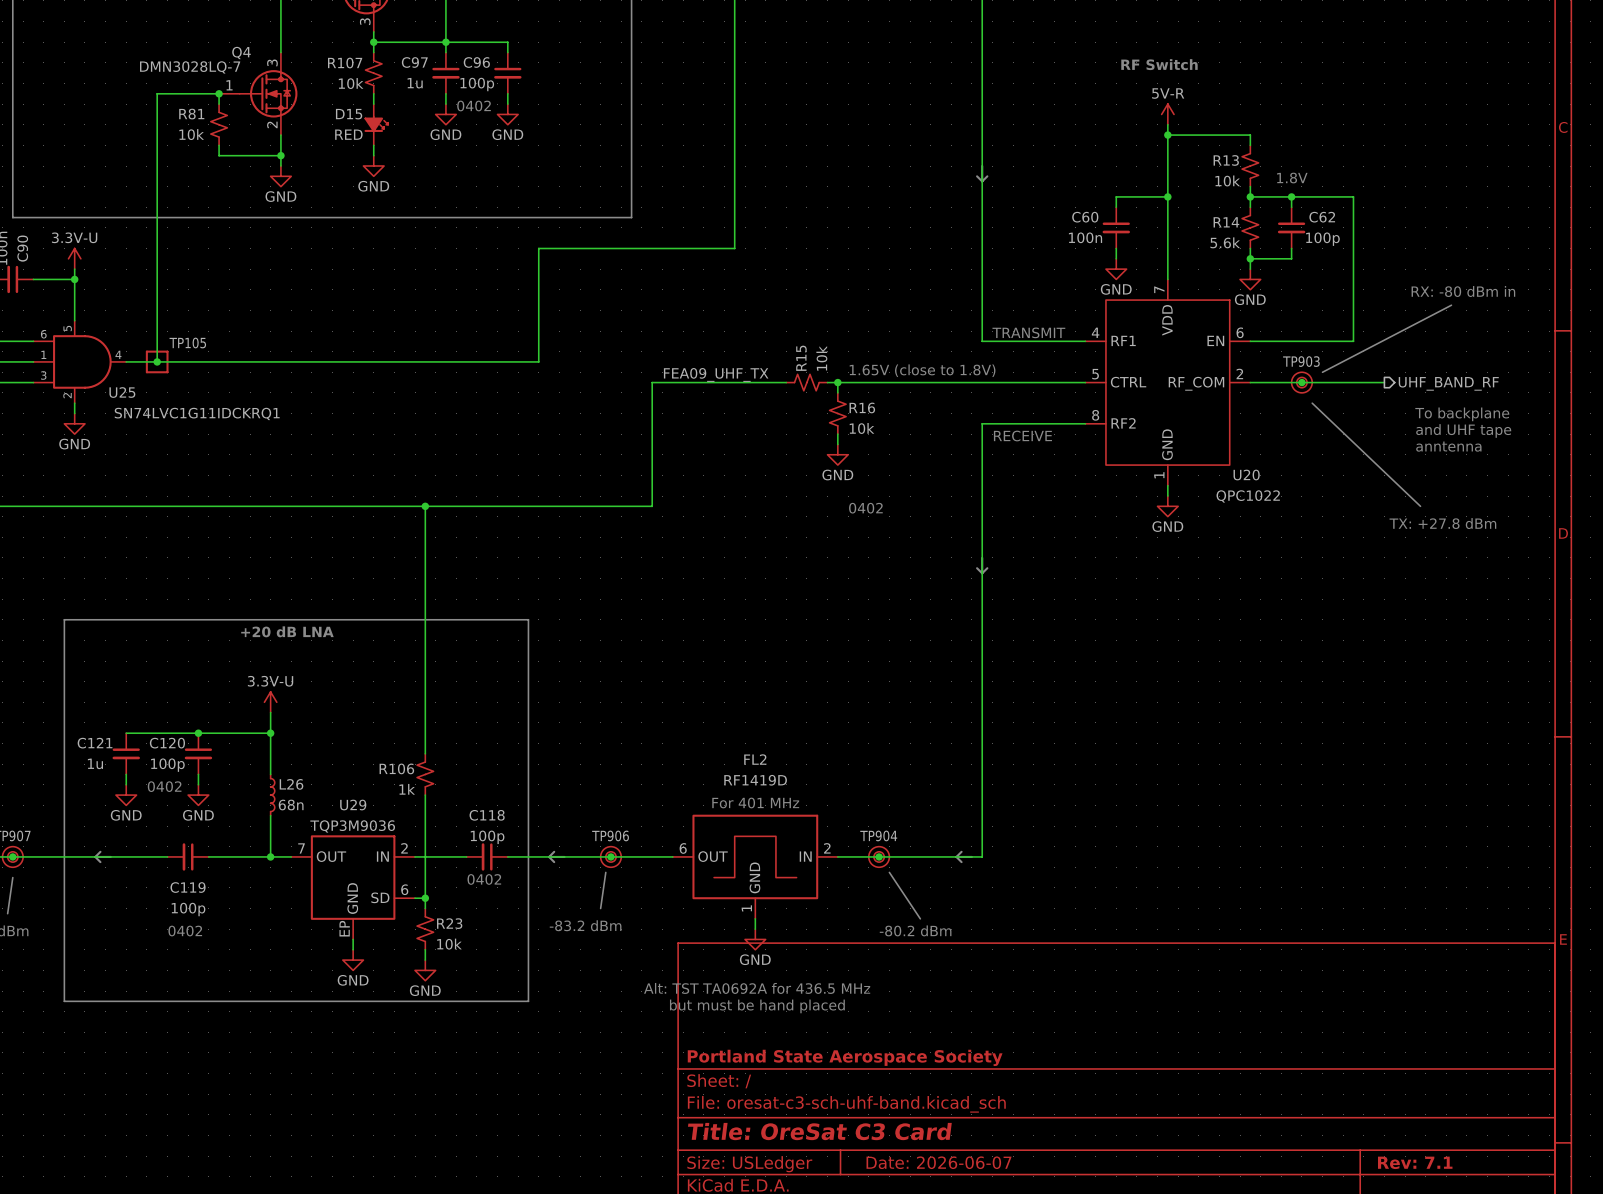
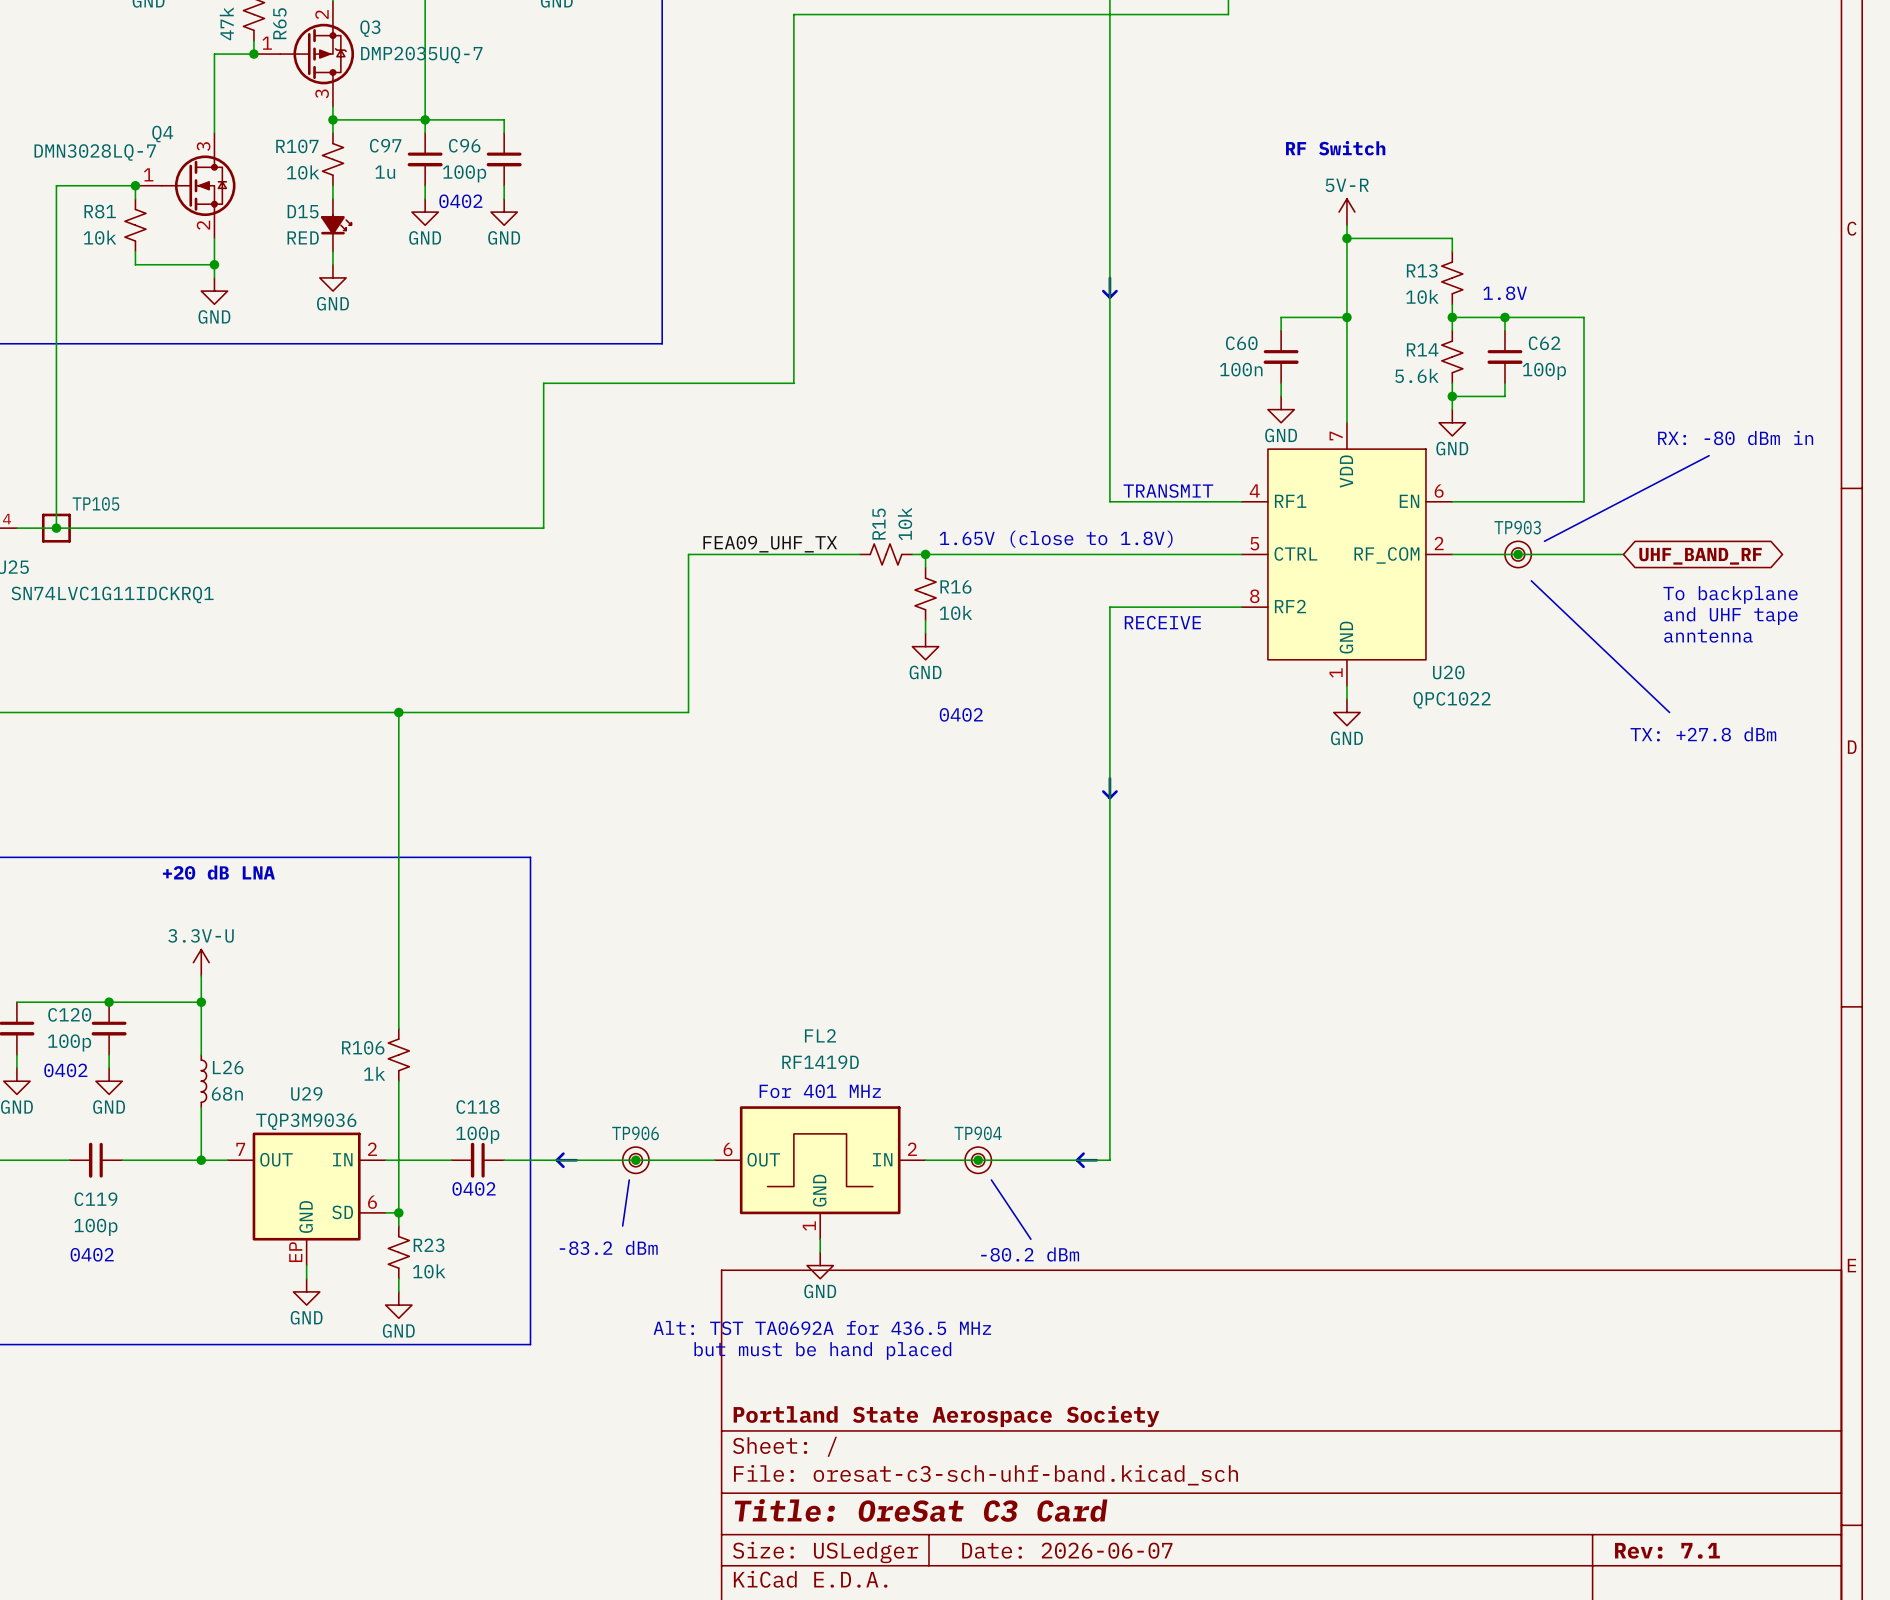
hierarchical label: UHF_BAND_RF (1448, 383) -> none
global label: none -> UHF_BAND_RF (1700, 556)

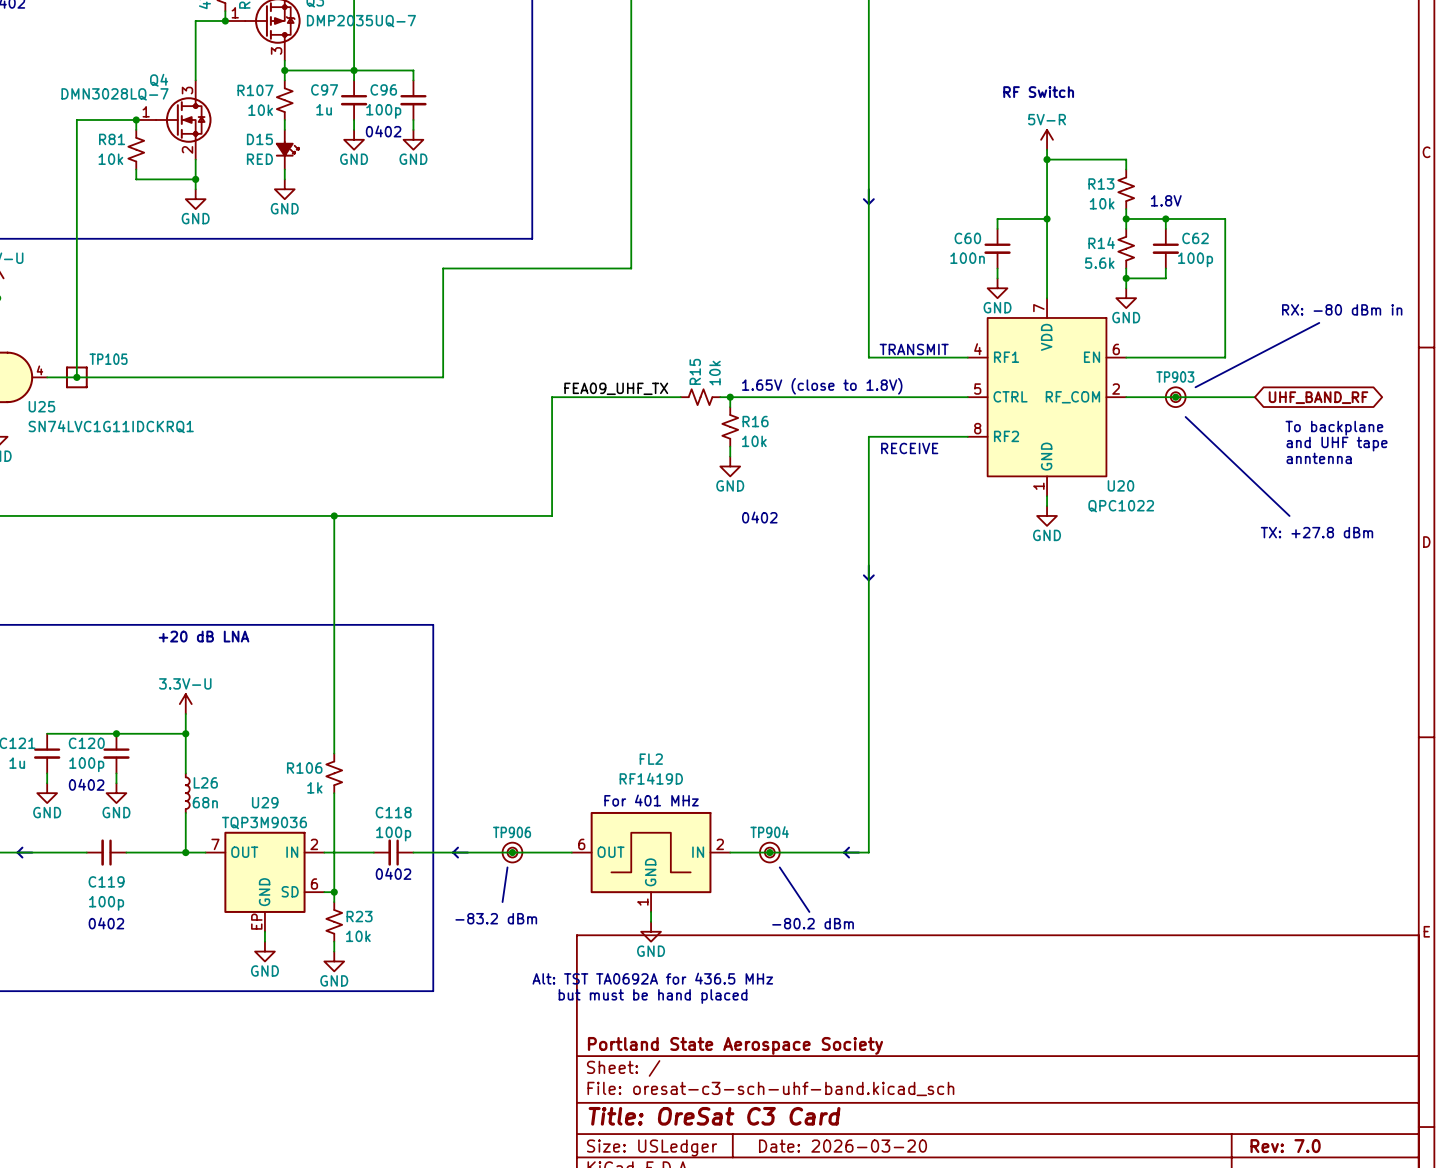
title block: Date: 2026-06-07 (1067, 1550) -> Date: 2026-03-20 (843, 1146)
title block: Rev: 7.1 (1667, 1550) -> Rev: 7.0 (1285, 1146)

